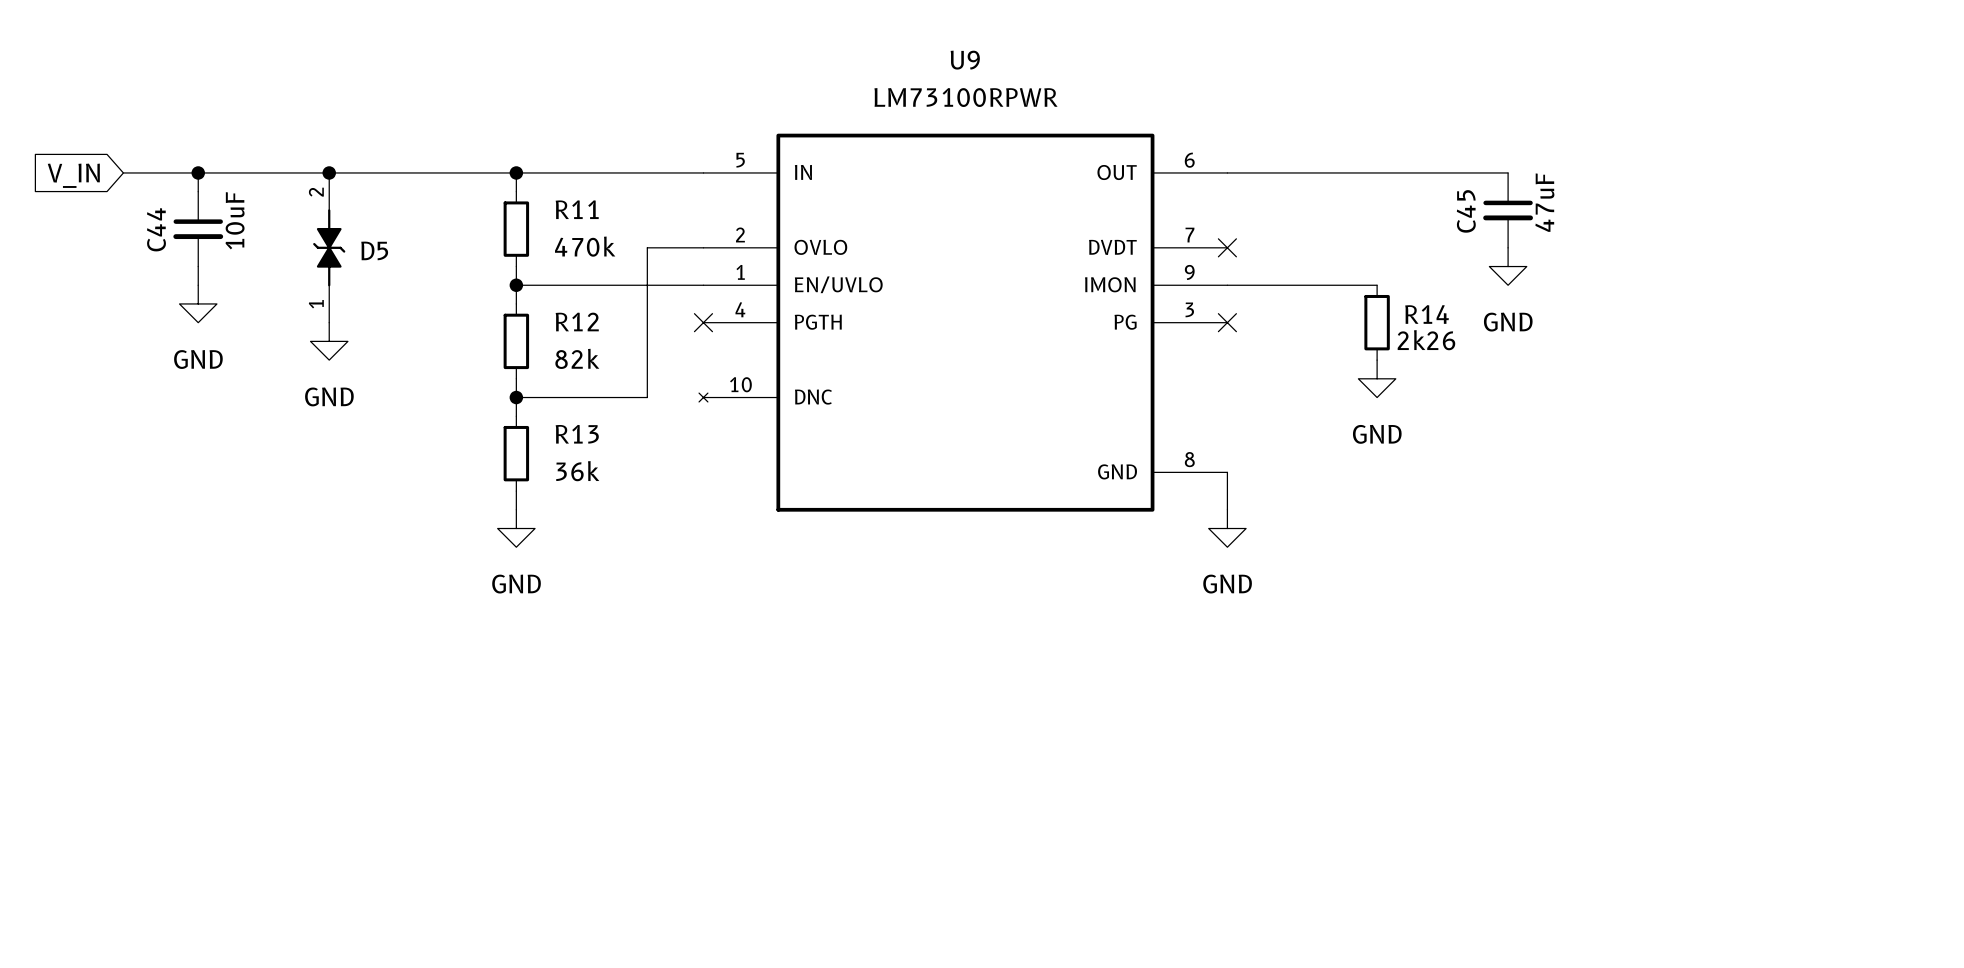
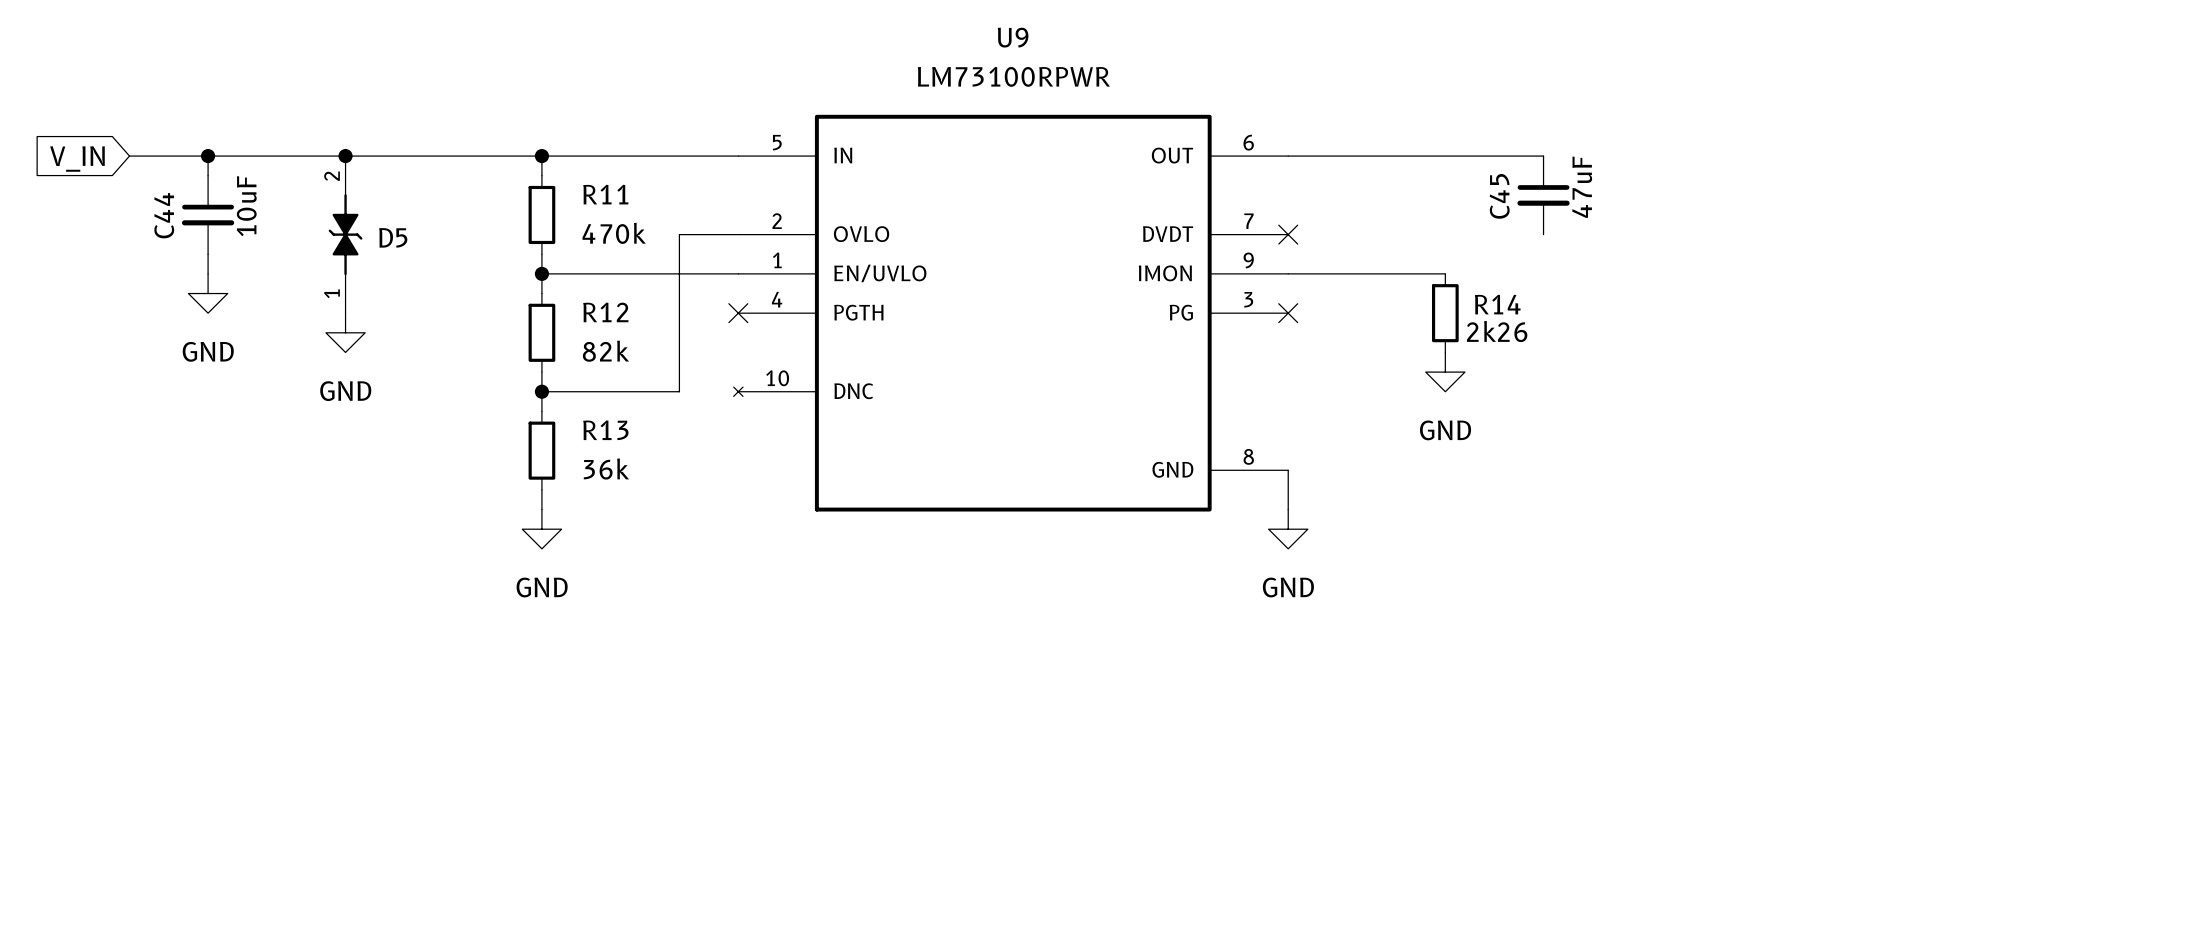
wire: (1470, 172) (1508, 172) -> none
C45 position: (1508, 210) -> (1543, 195)
power symbol: GND (1508, 266) -> none

